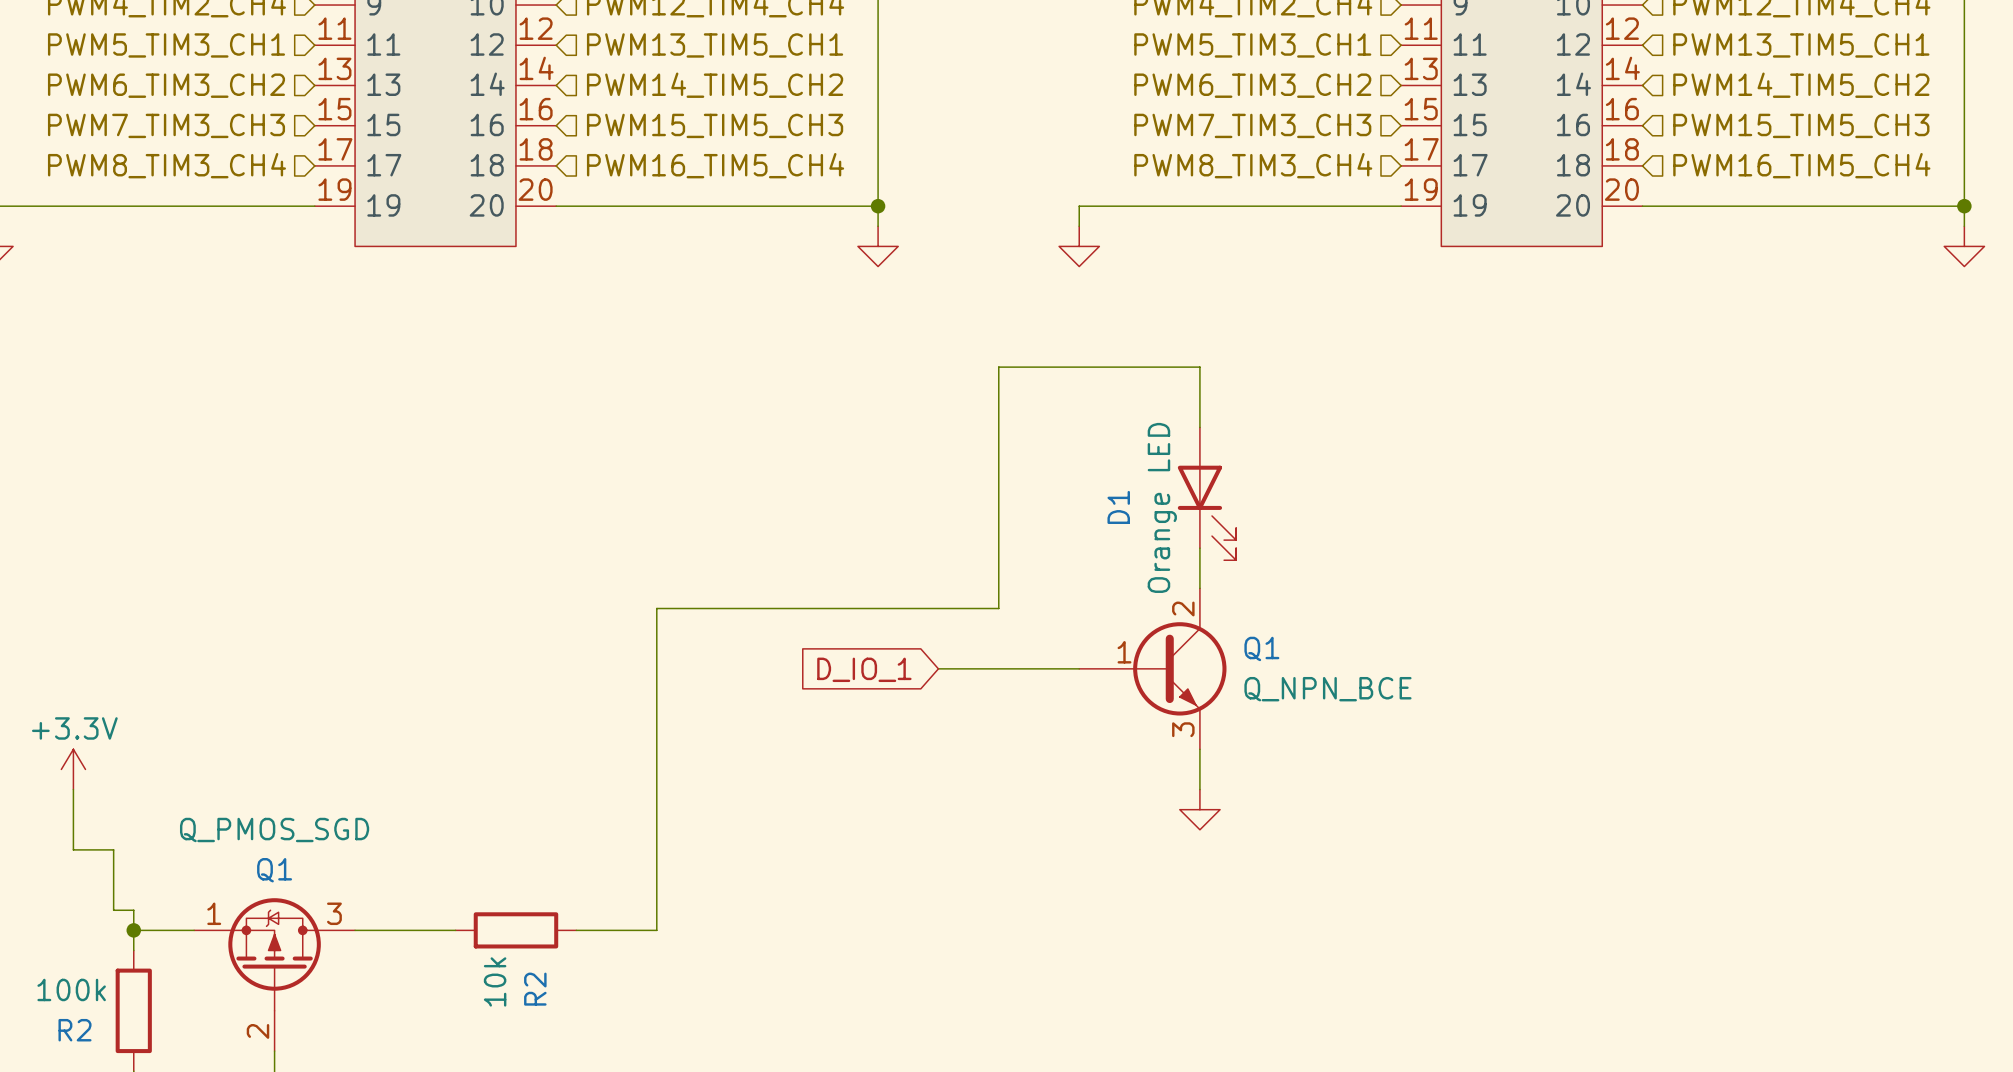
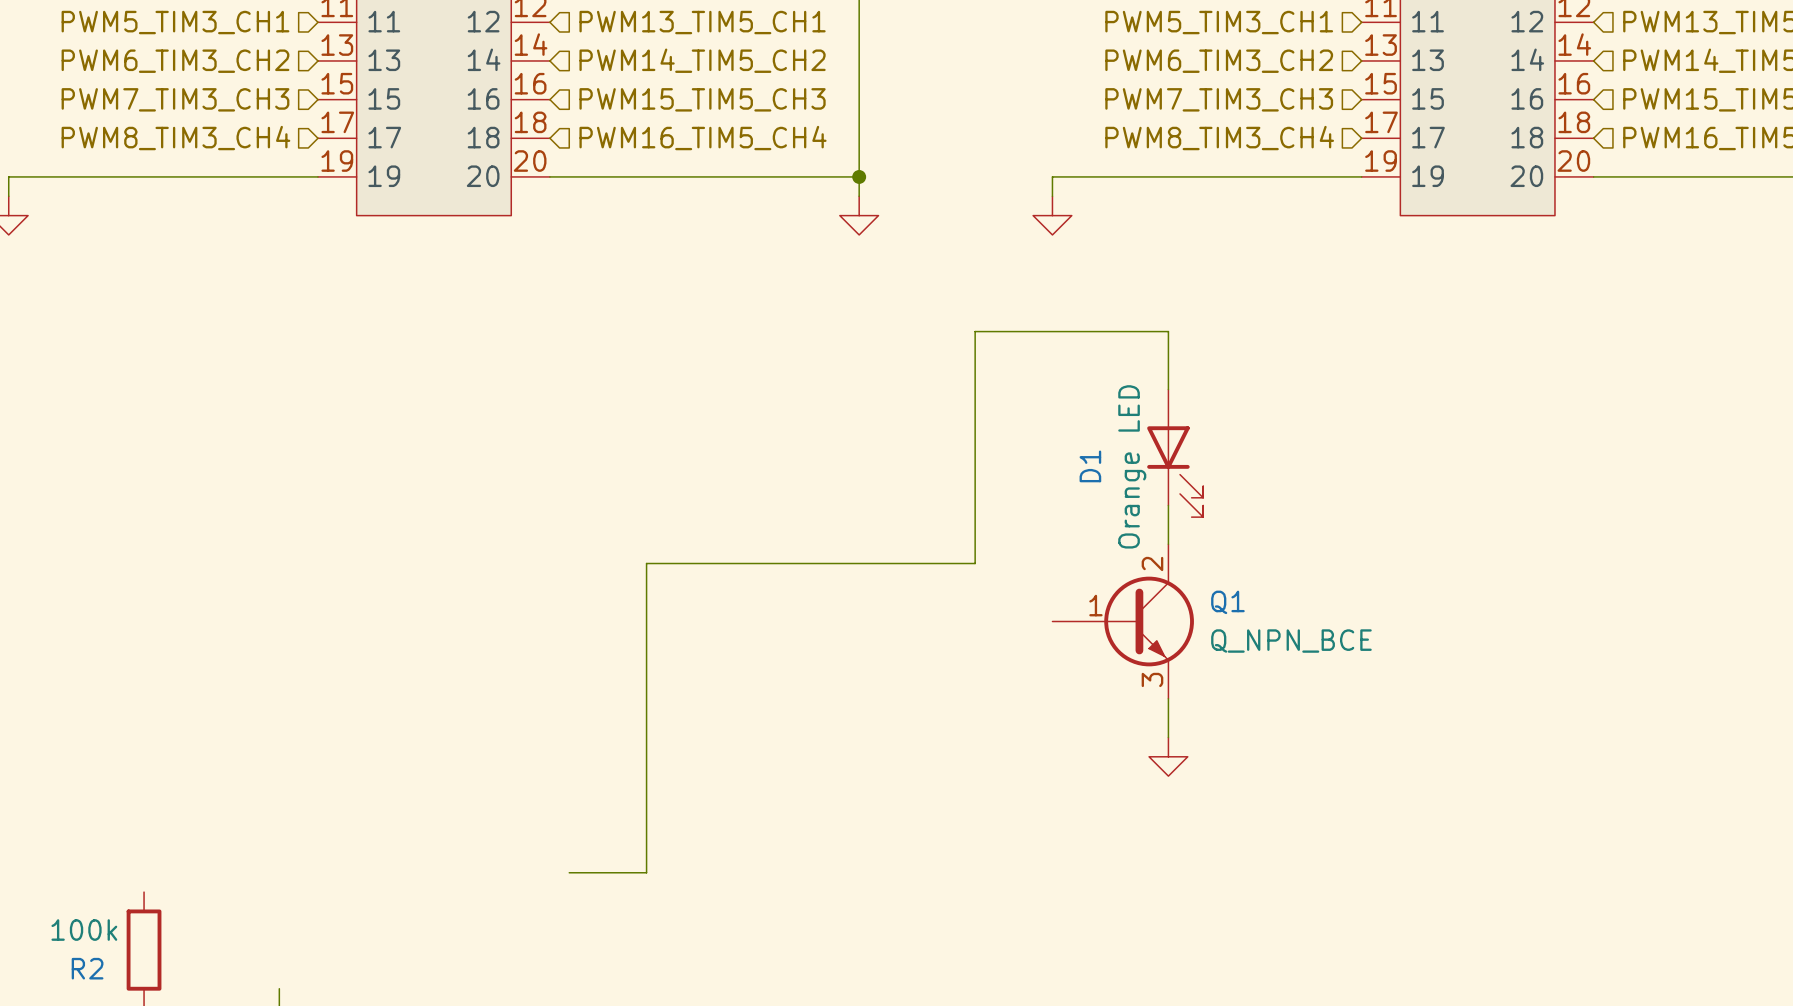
wire: (938, 668) (1079, 668) -> none
global label: D_IO_1 (864, 669) -> none
power symbol: +3.3V (73, 769) -> none
wire: (73, 789) (73, 849) (113, 849) (113, 910) (133, 910) (133, 950) -> none
wire: (133, 930) (194, 930) -> none
junction: (133, 930) -> none
wire: (355, 930) (455, 930) -> none
R2: 10k (515, 930) -> none
Q1: Q_PMOS_SGD (274, 974) -> none

